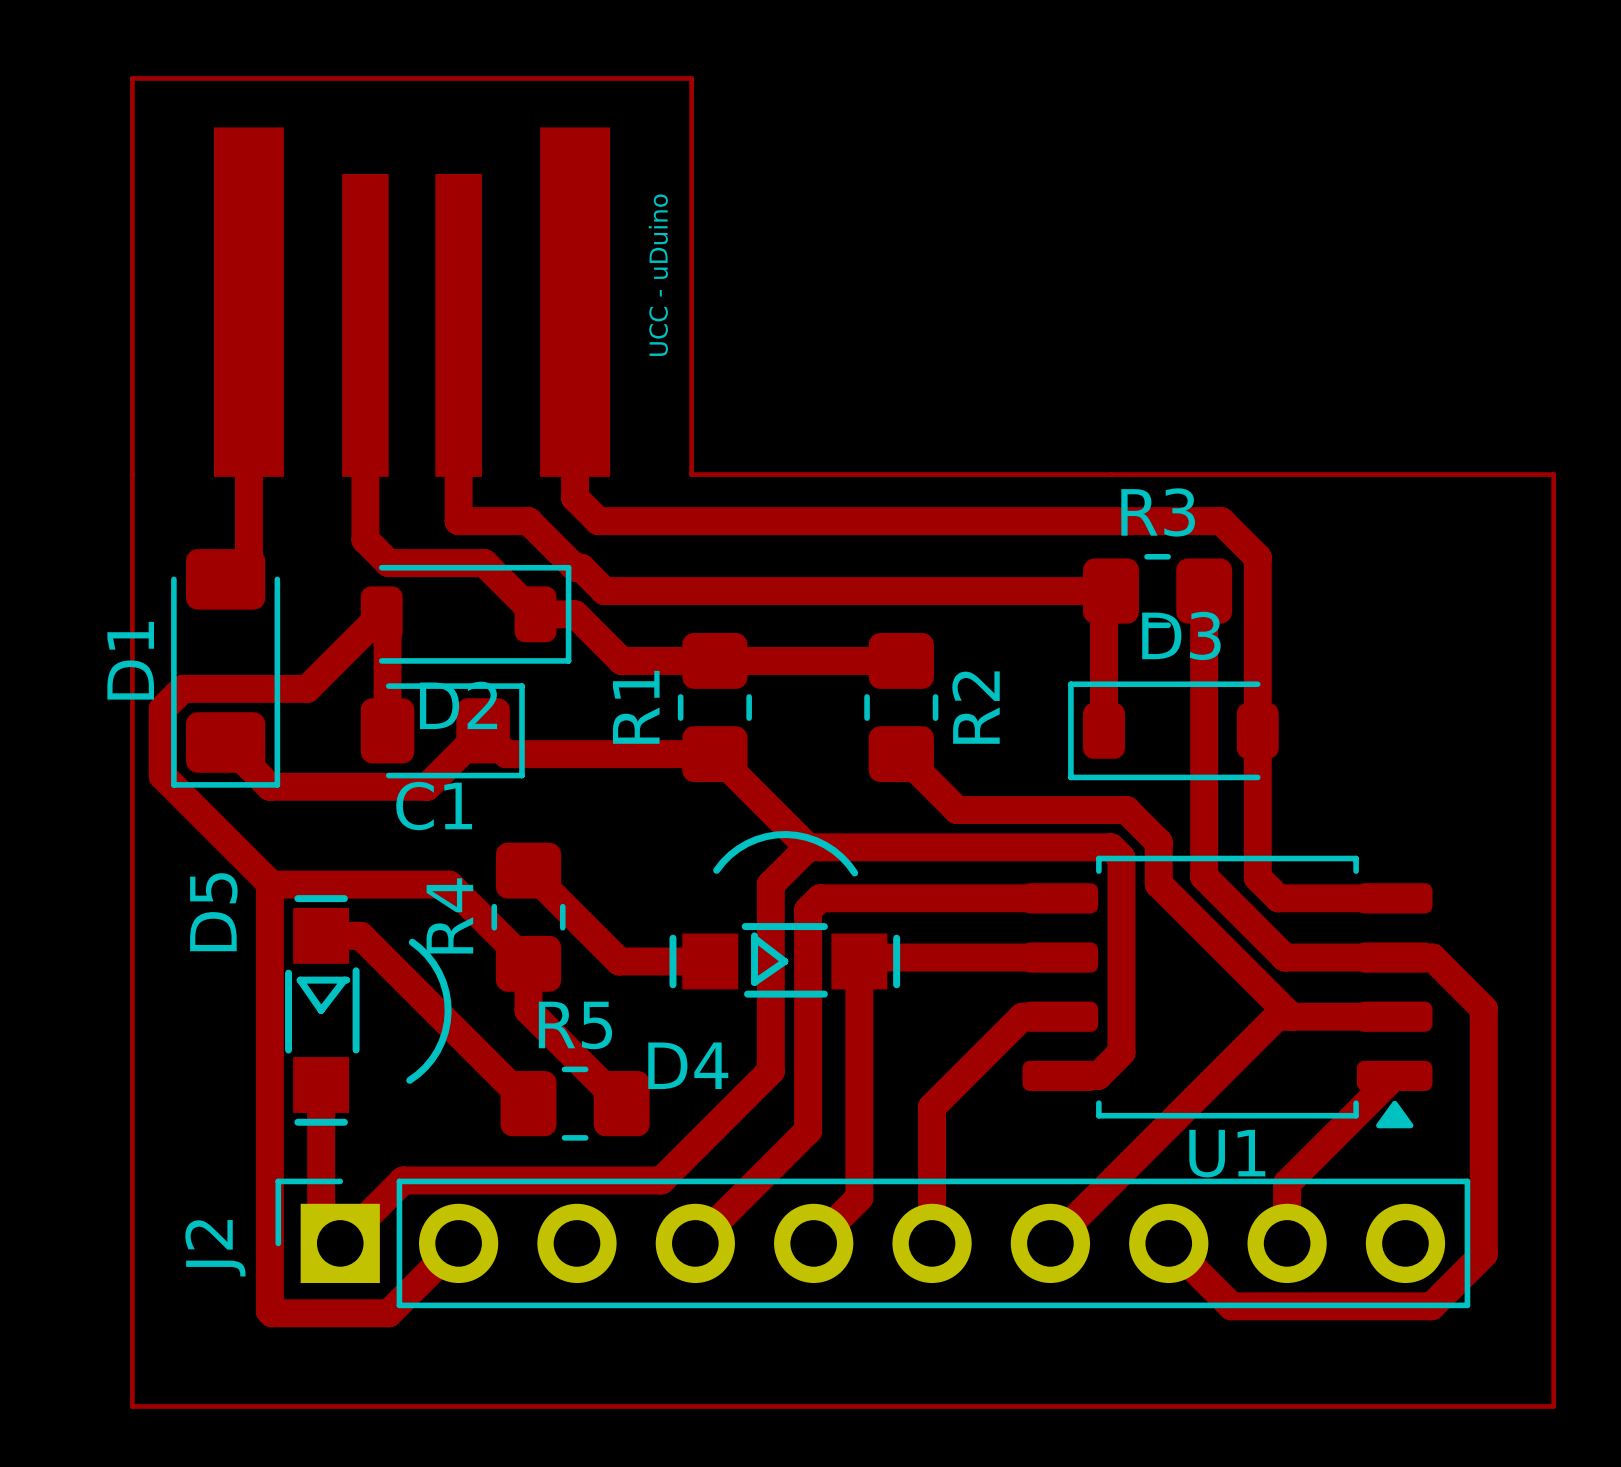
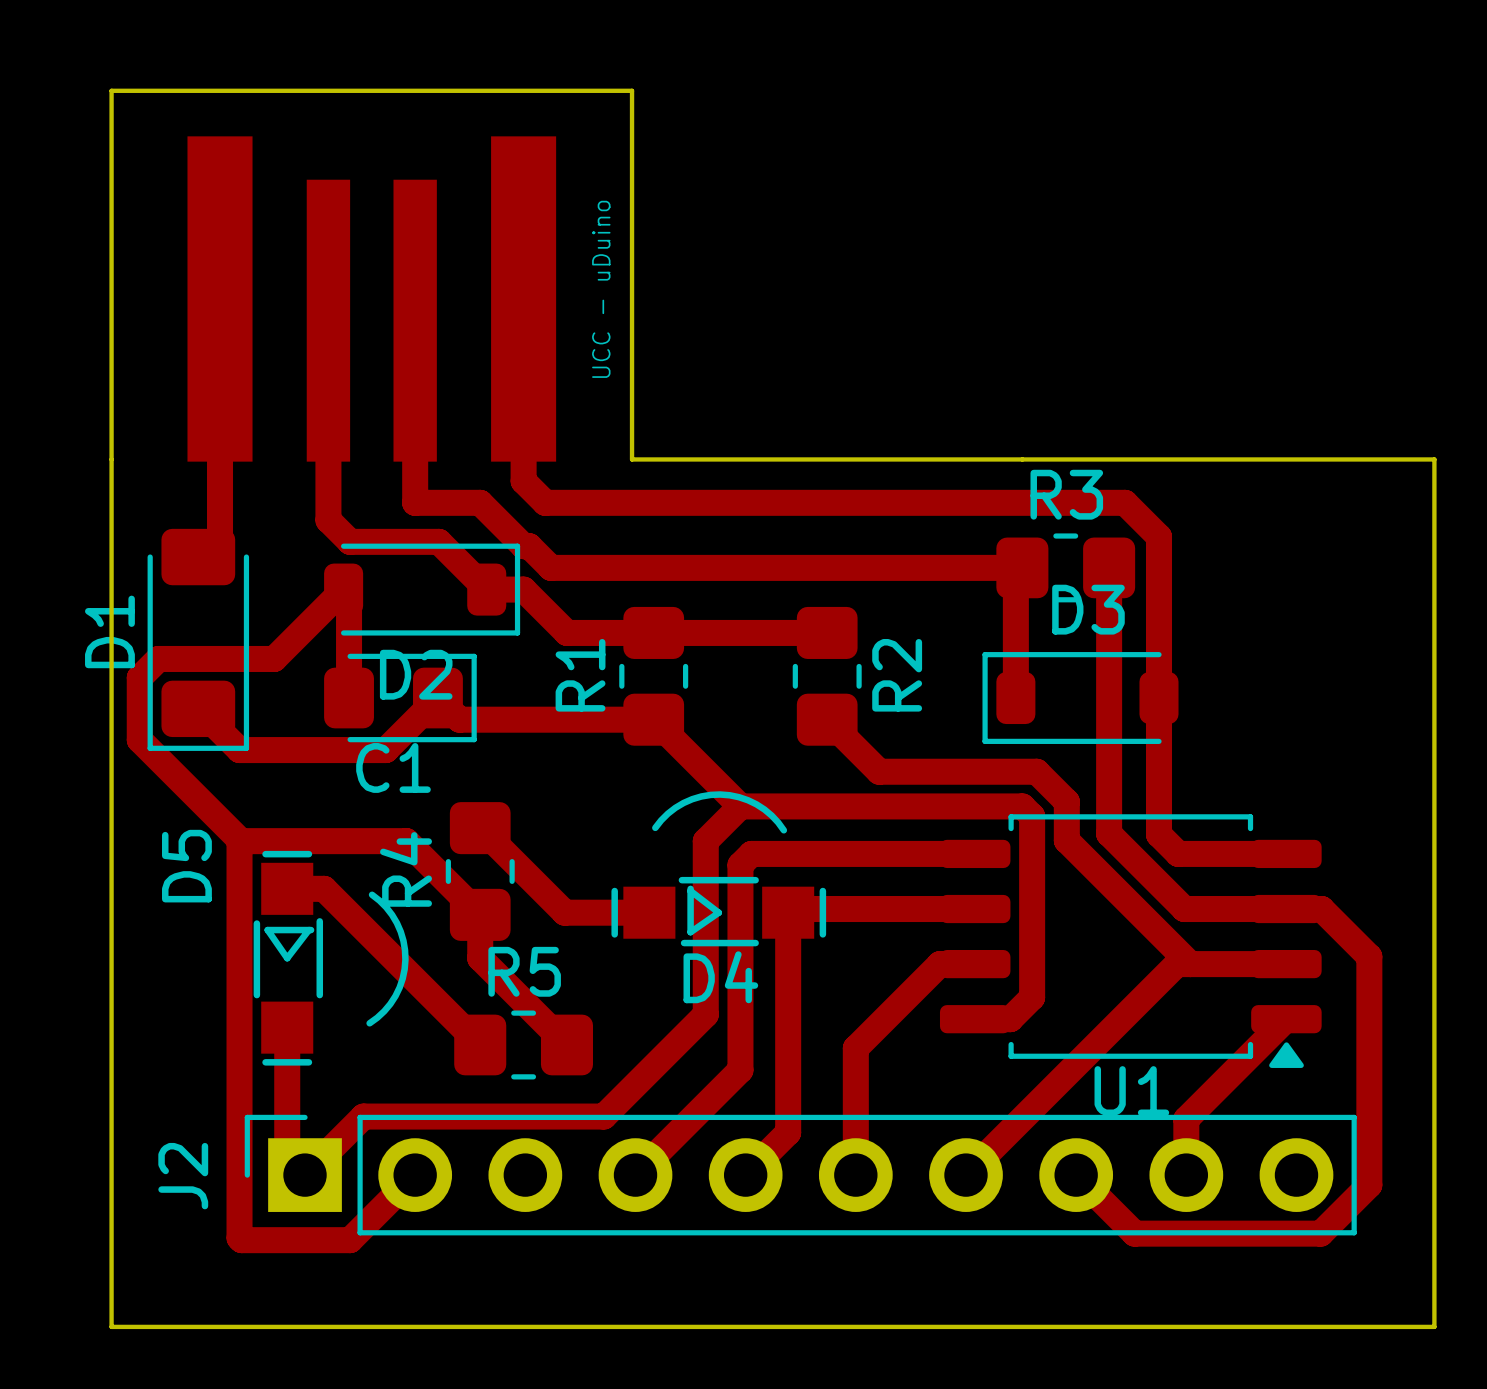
top track: (132, 78) (691, 78) (691, 474) (1553, 474) (1553, 1406) (132, 1406) (132, 78) -> none
board edge: none -> (111, 90) (632, 90) (632, 459) (1434, 459) (1434, 1326) (111, 1326) (111, 90)
D4 name position: D4 (688, 1065) -> D4 (720, 977)

